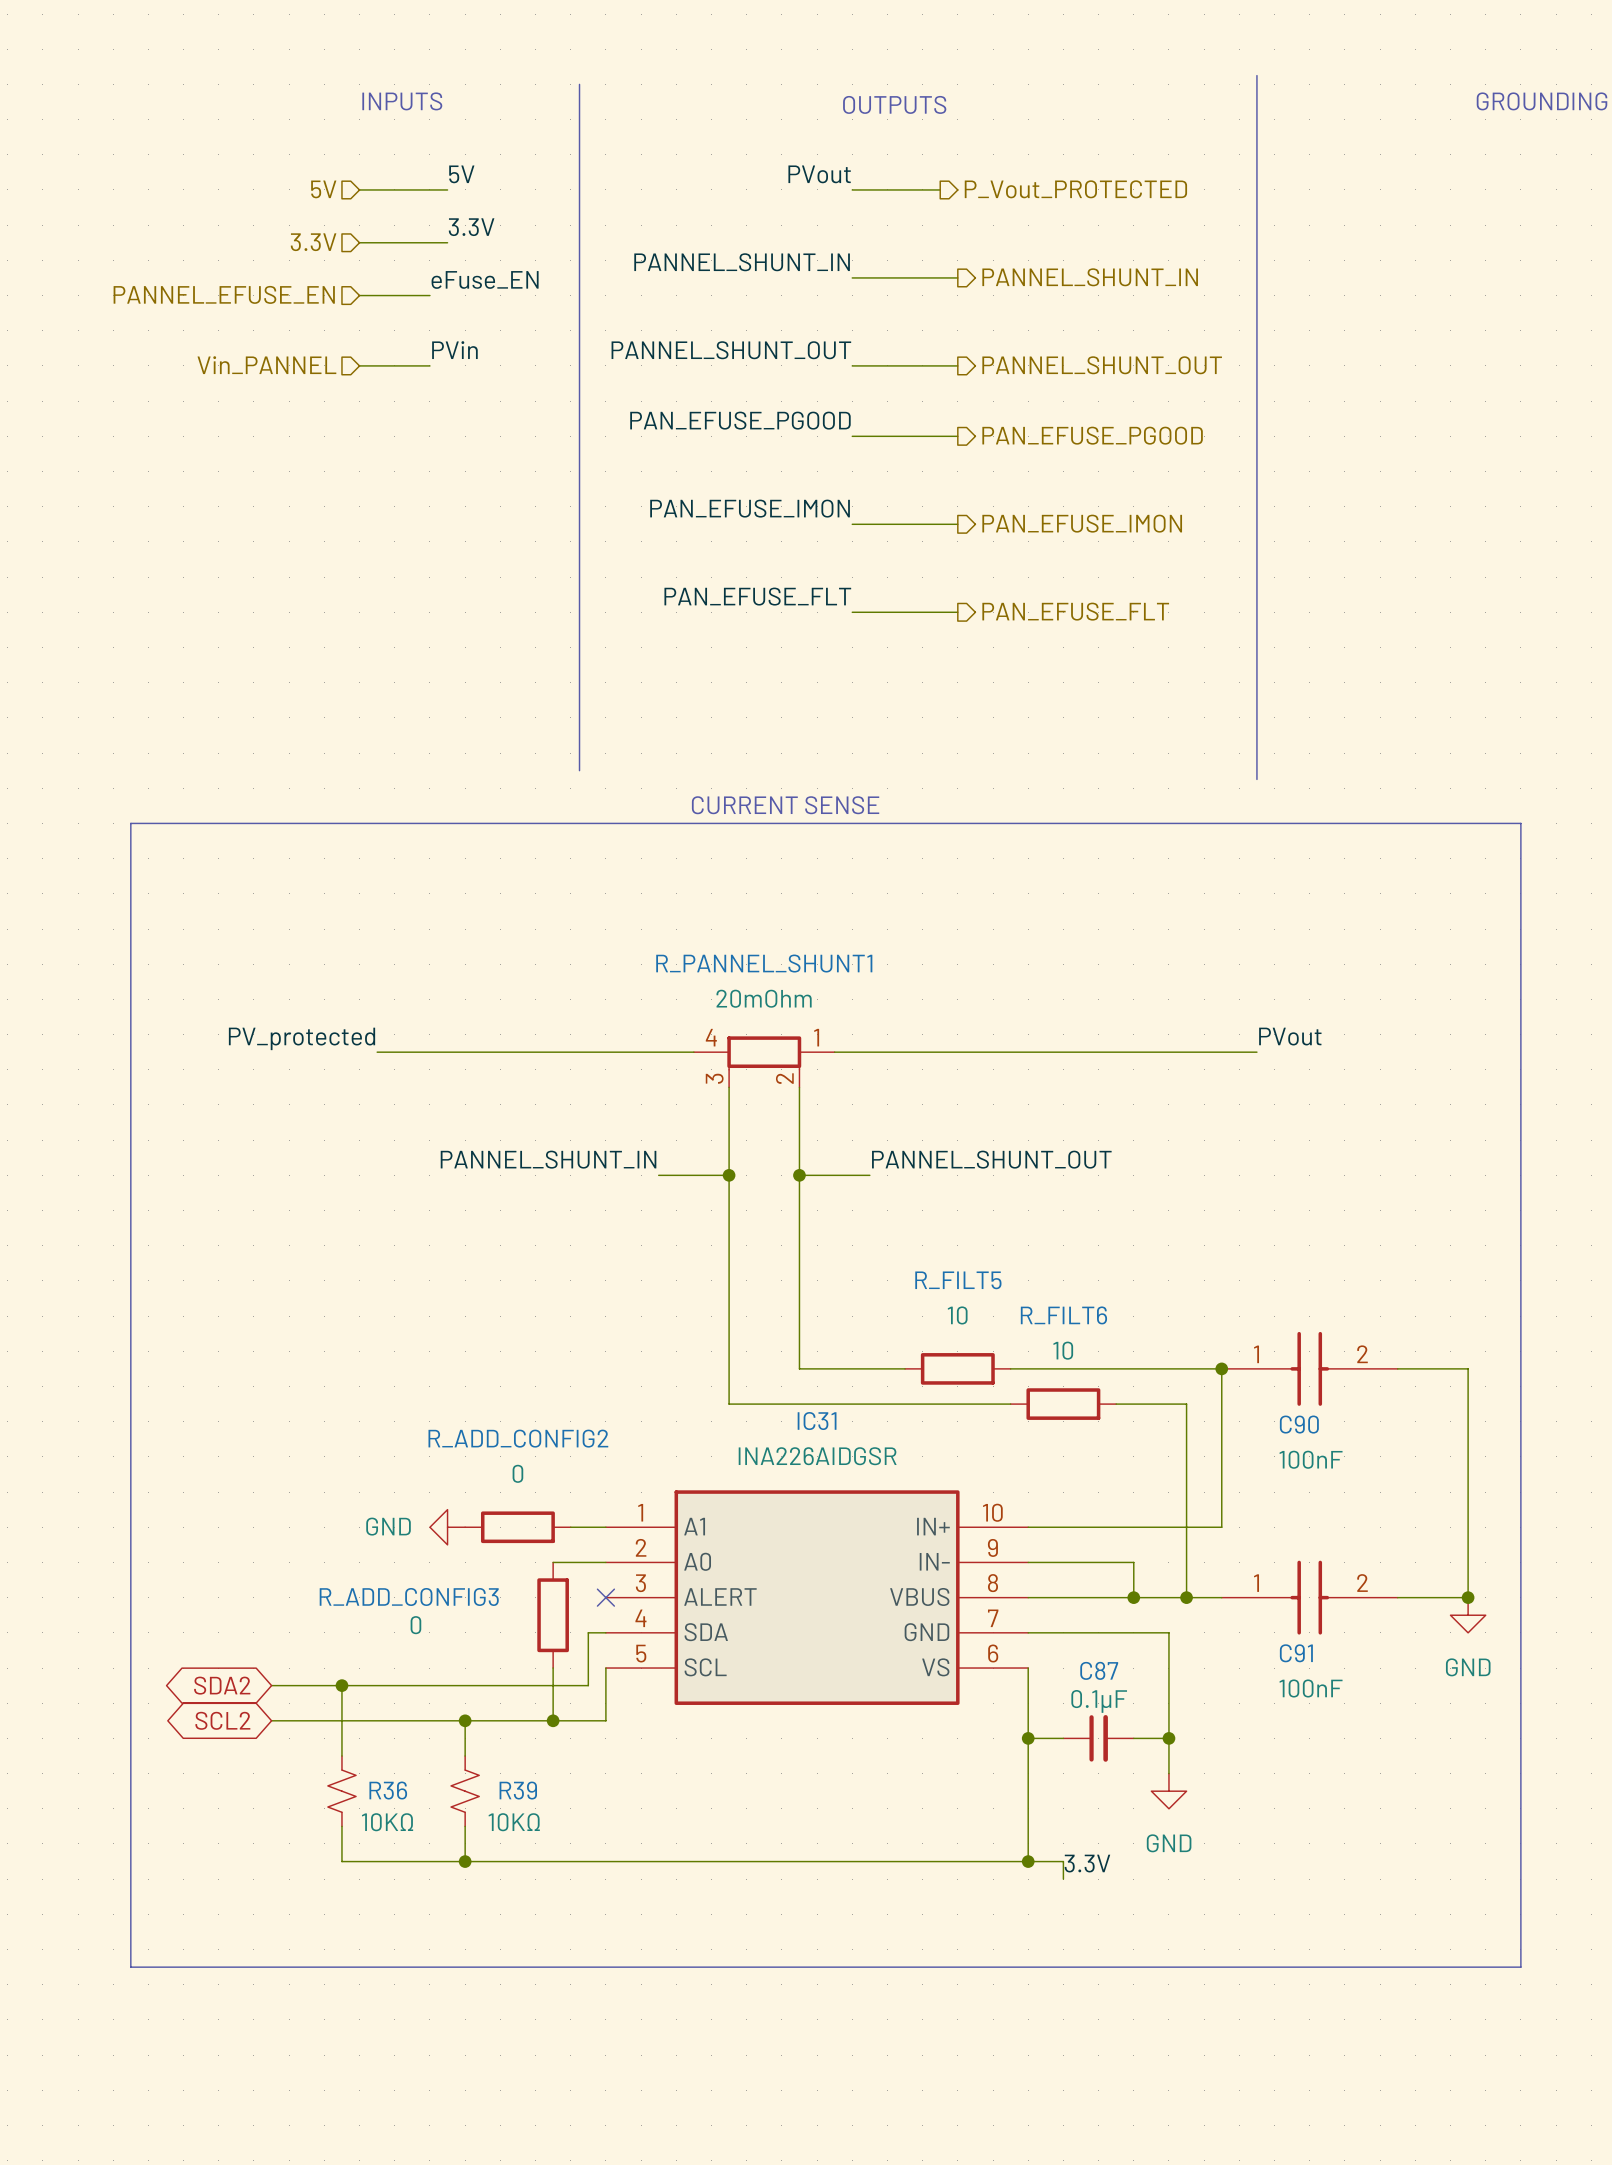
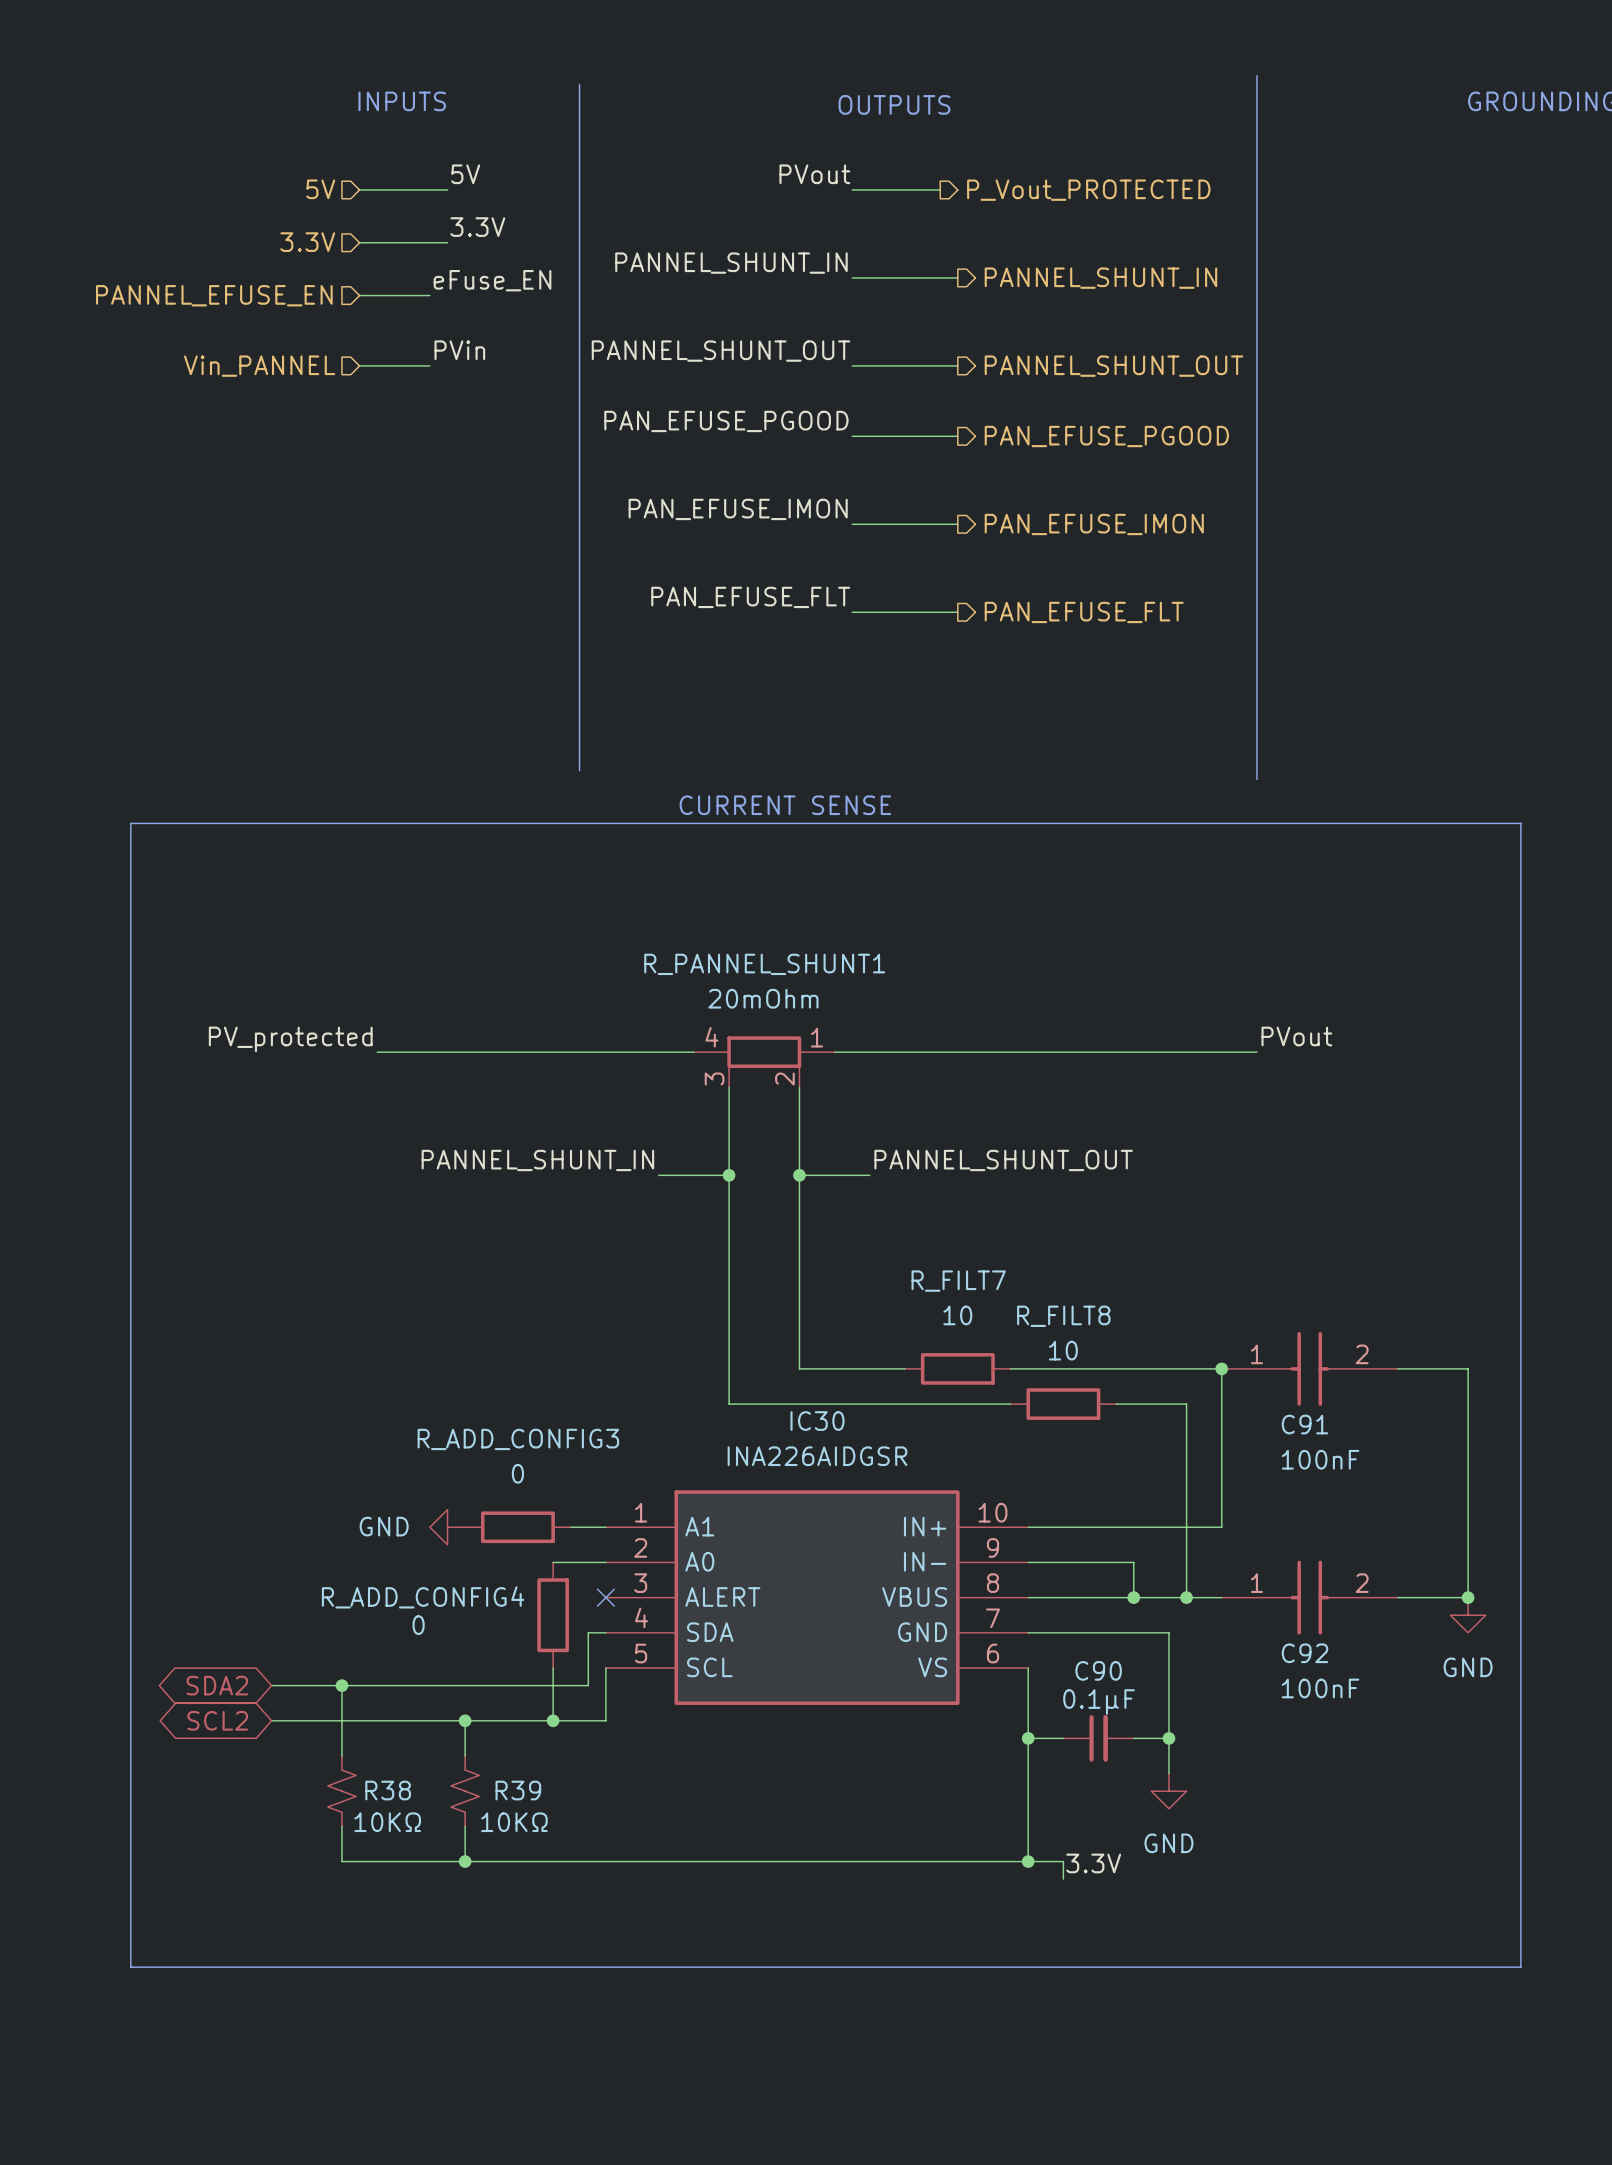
R_FILT5 name: R_FILT5 (958, 1280) -> R_FILT7 (958, 1281)
R_FILT6 name: R_FILT6 (1063, 1315) -> R_FILT8 (1063, 1316)
IC31 name: IC31 (817, 1421) -> IC30 (817, 1421)
C90 name: C90 (1299, 1424) -> C91 (1305, 1424)
R_ADD_CONFIG2 name: R_ADD_CONFIG2 (518, 1438) -> R_ADD_CONFIG3 (518, 1439)
R_ADD_CONFIG3 name: R_ADD_CONFIG3 (409, 1596) -> R_ADD_CONFIG4 (423, 1597)
C91 name: C91 (1296, 1653) -> C92 (1305, 1653)
C87 name: C87 (1099, 1670) -> C90 (1098, 1670)
R36 name: R36 (388, 1790) -> R38 (388, 1790)

